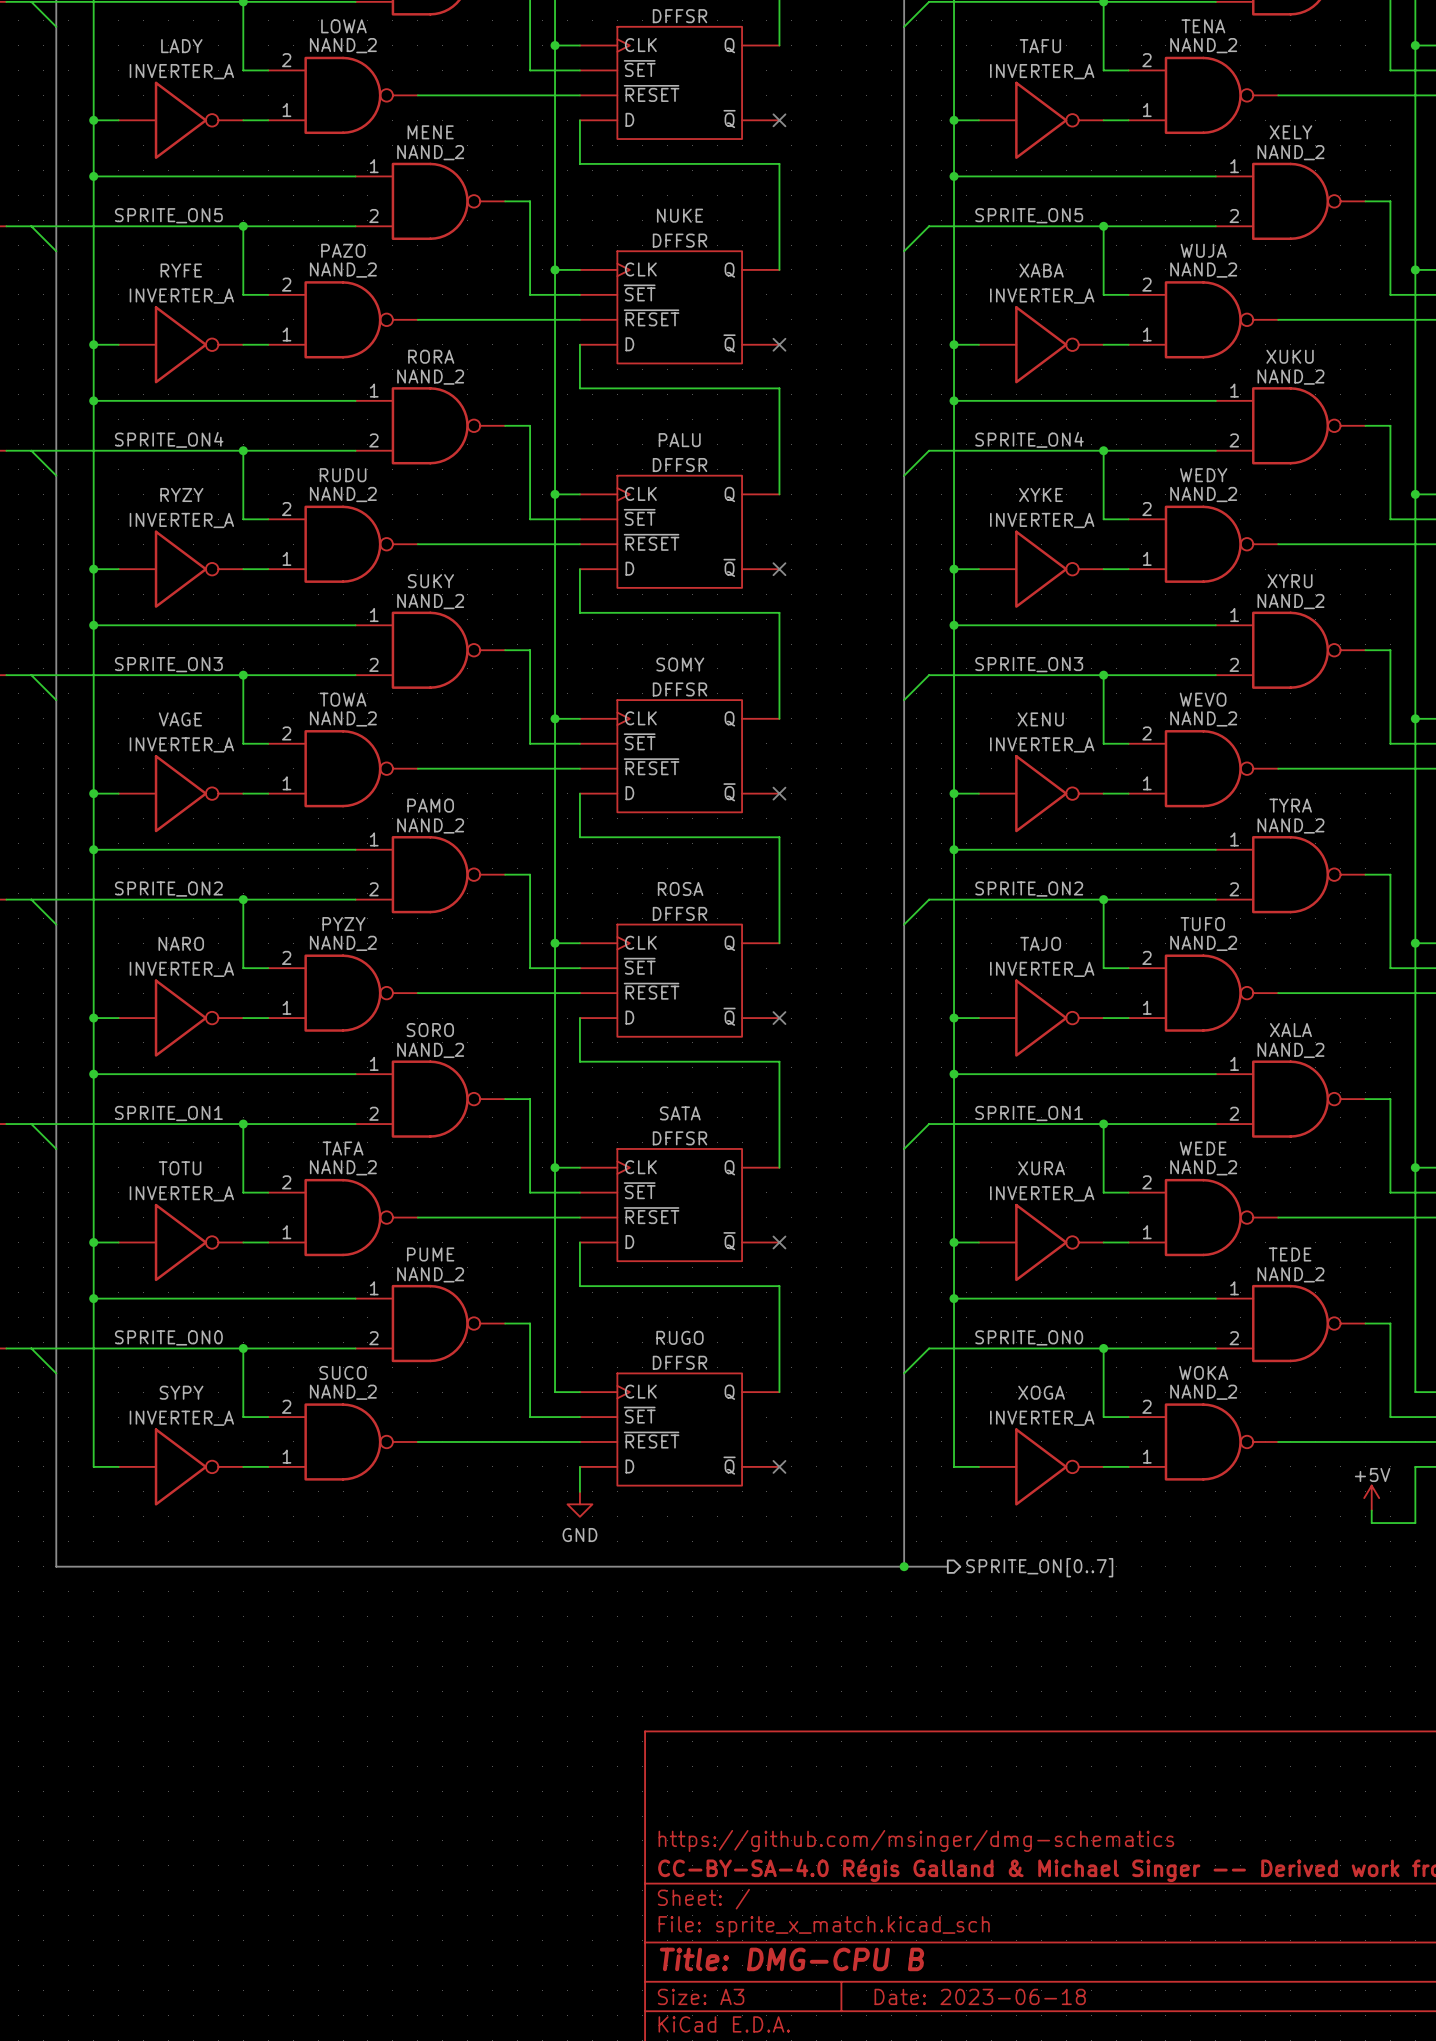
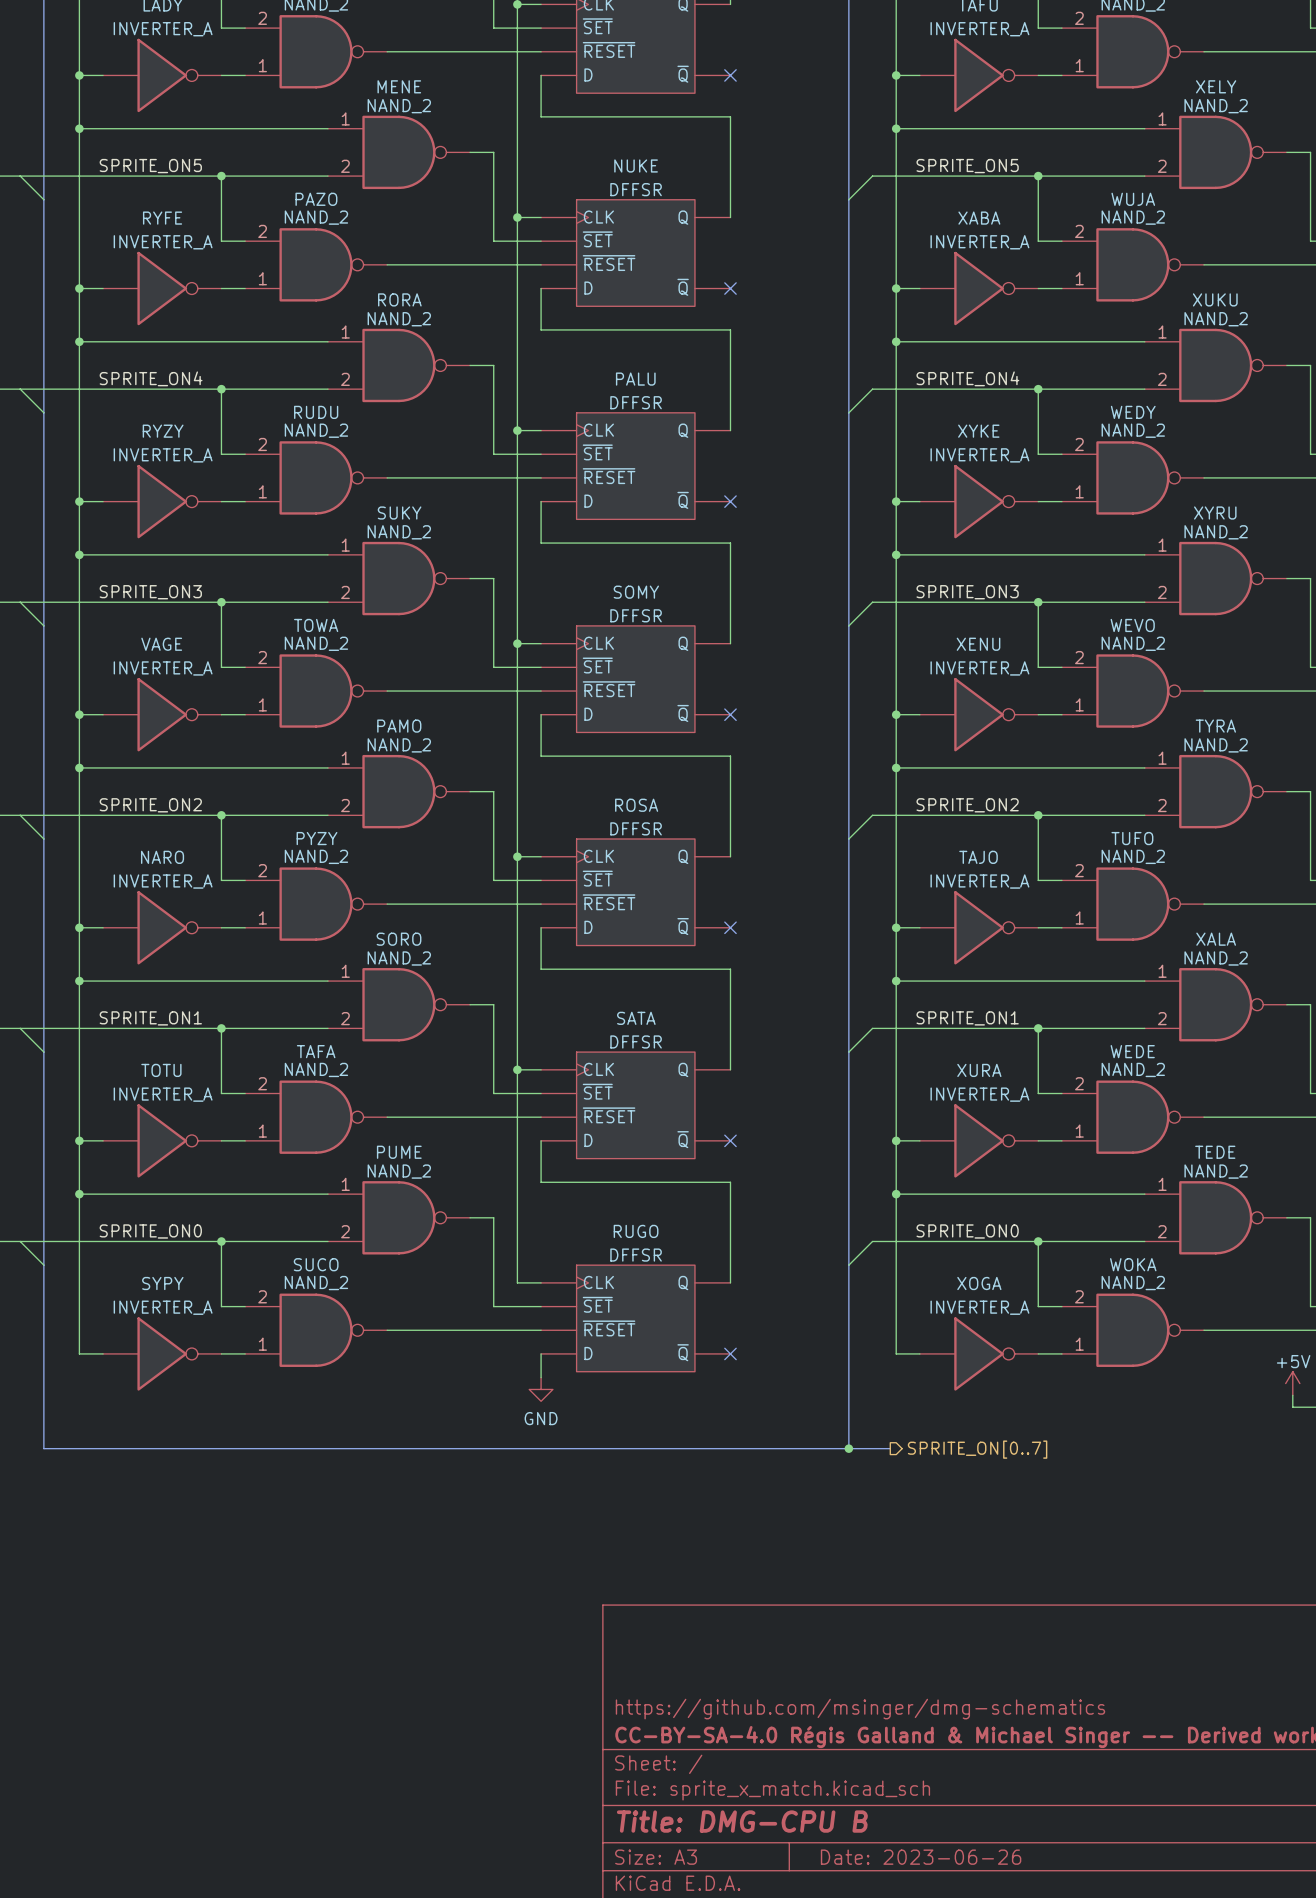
title block: Date: 2023-06-18 (980, 1996) -> Date: 2023-06-26 (921, 1857)

